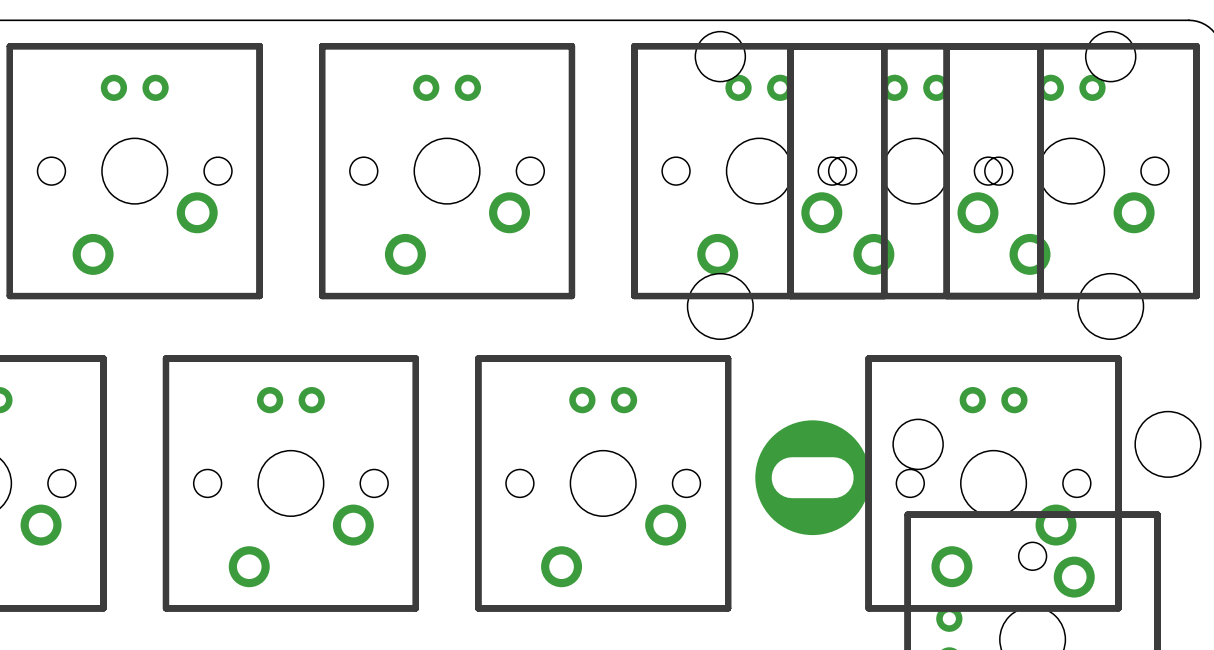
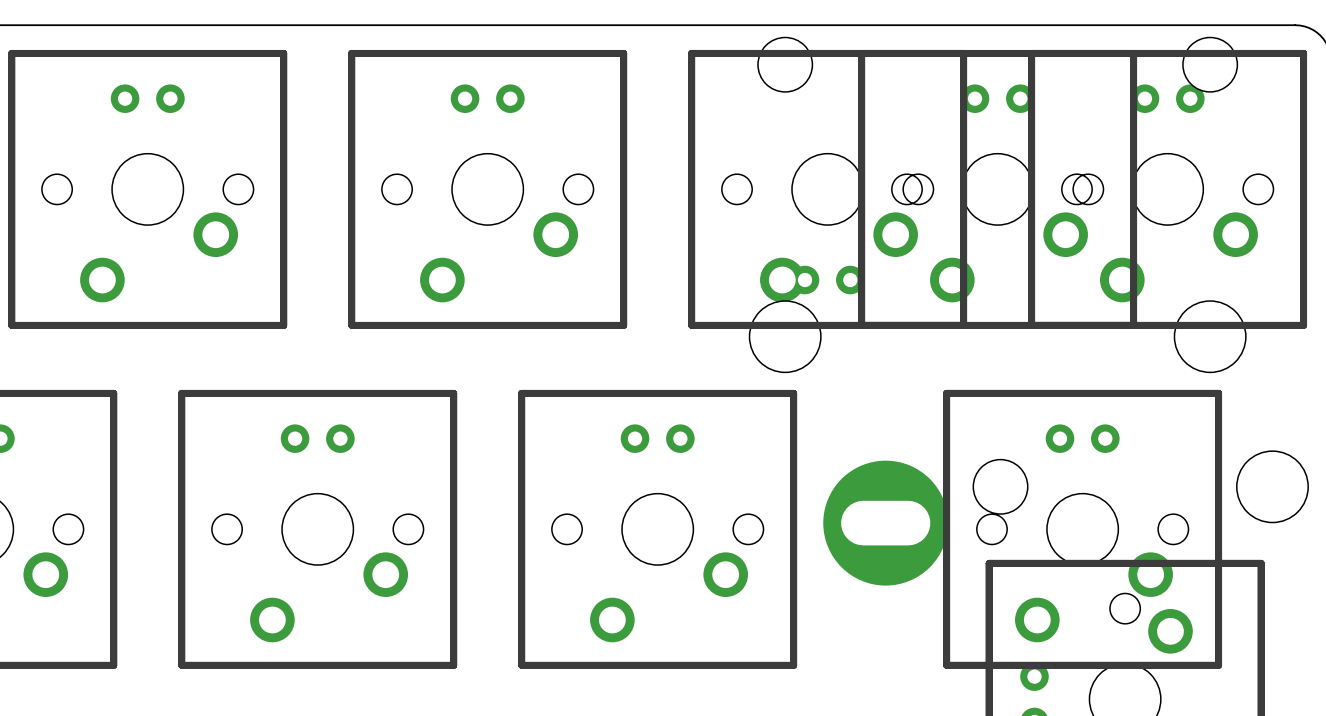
part rotation: 0° (759, 171) -> 180° (827, 189)

